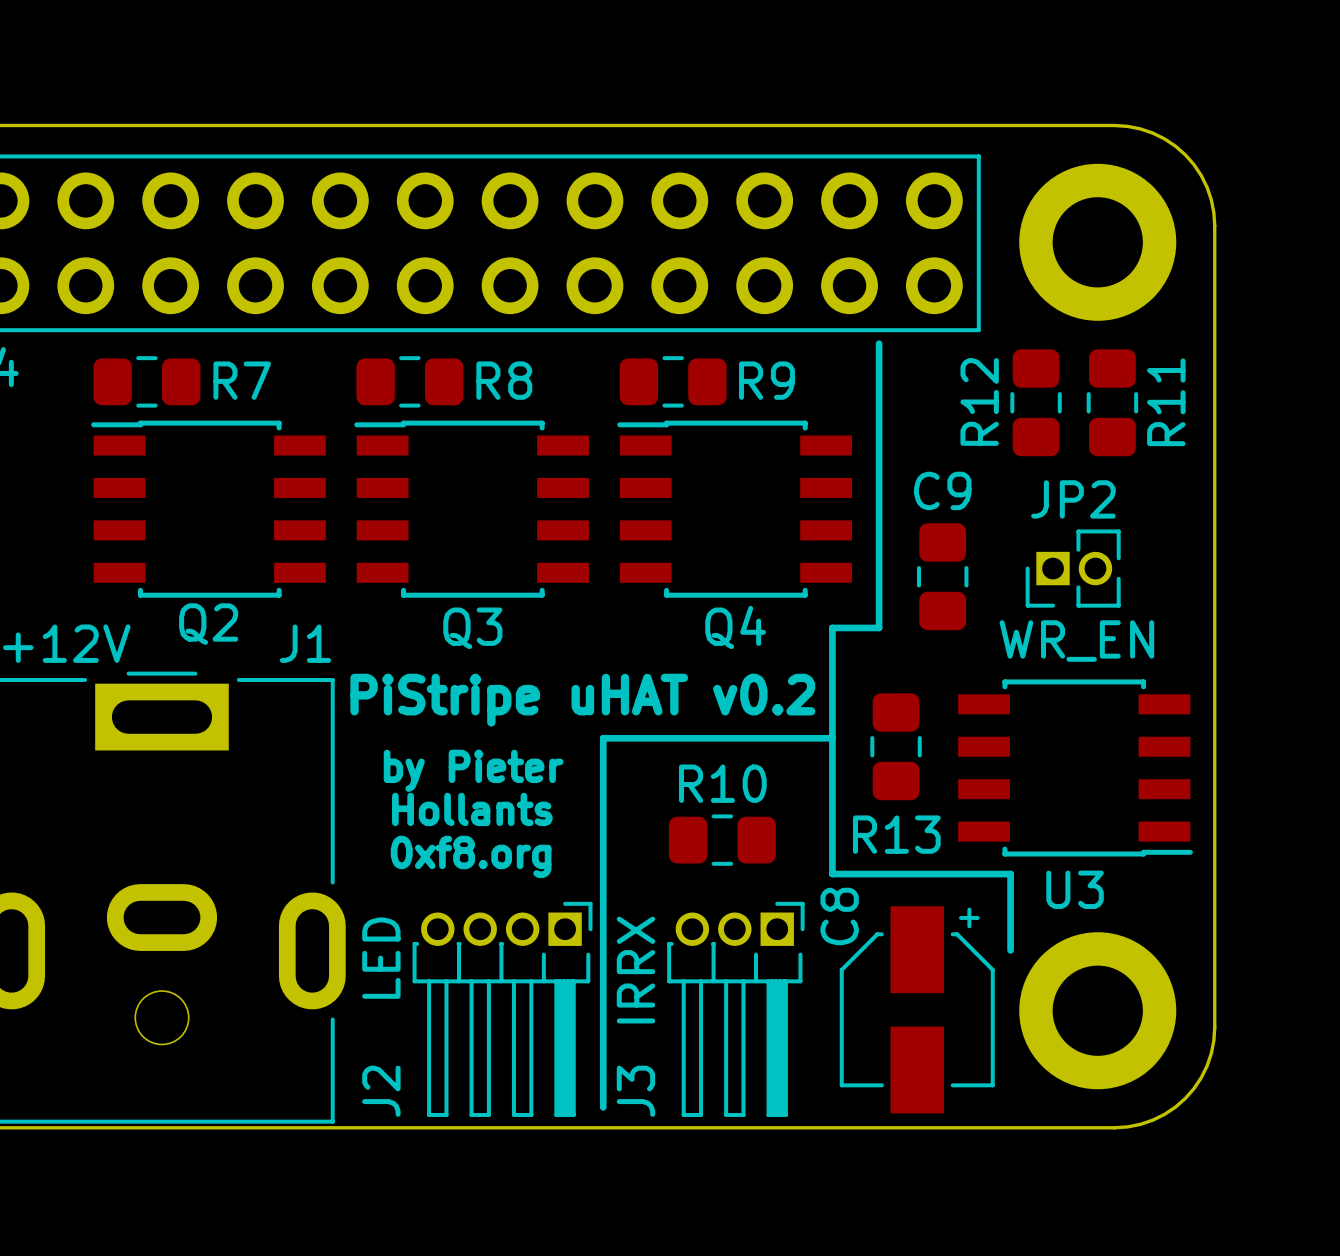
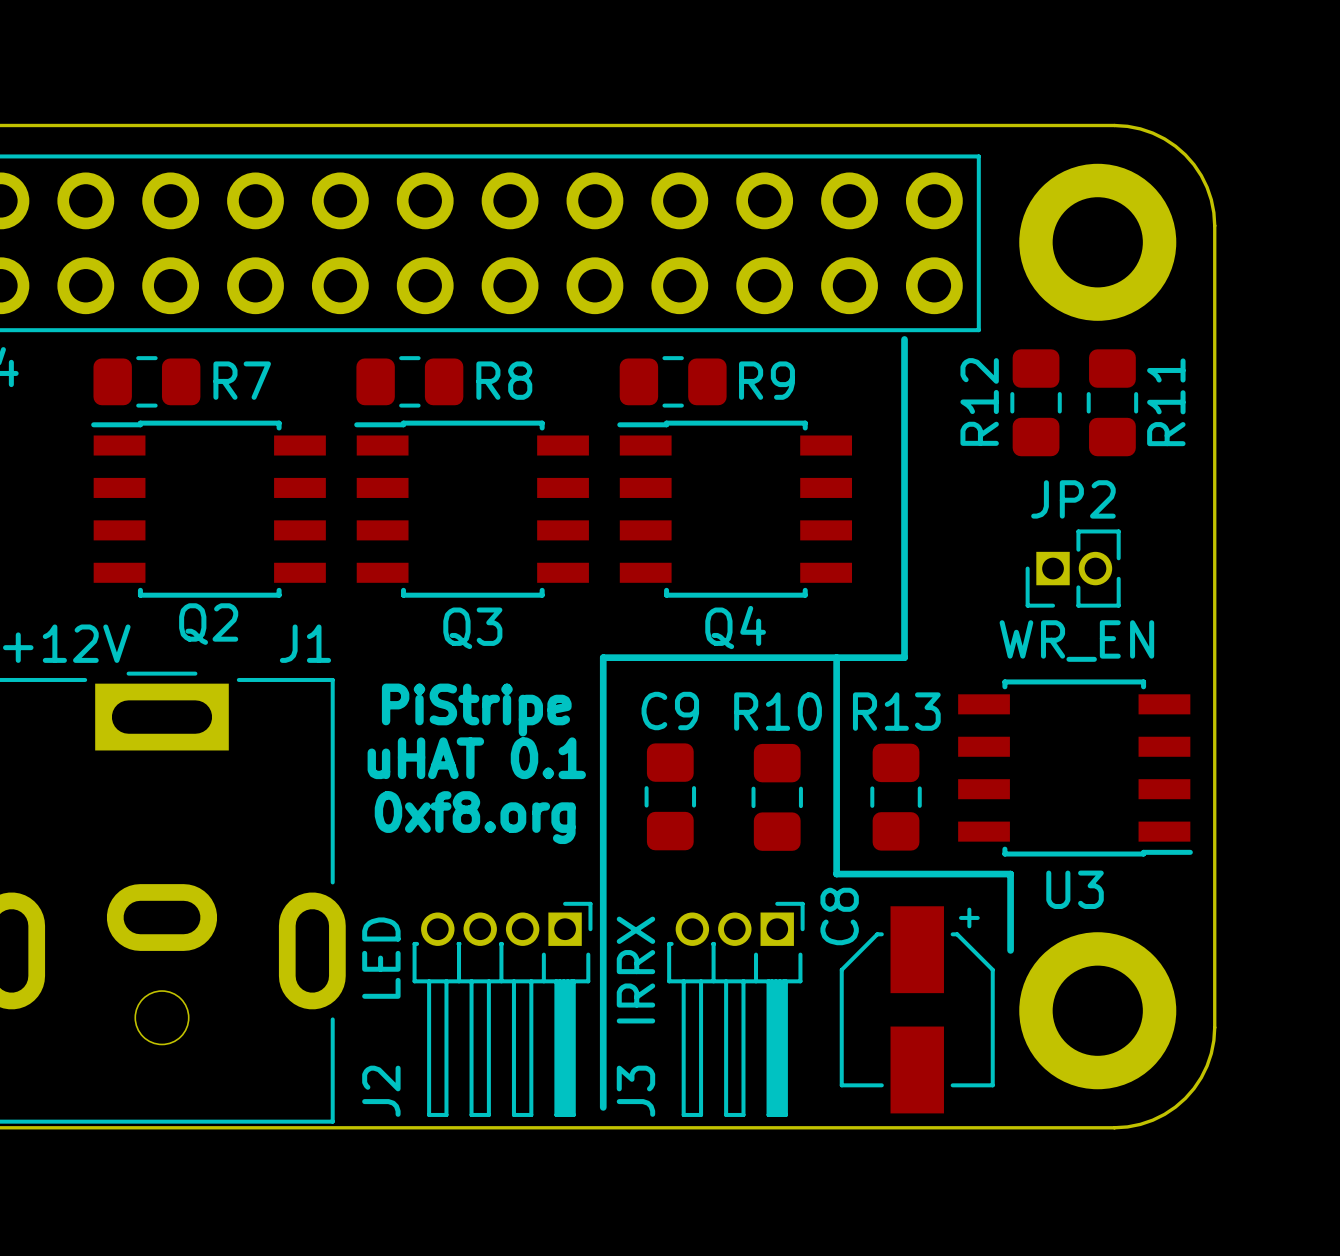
line: (879, 343) (879, 627) (832, 627) (832, 874) (836, 874) -> (836, 657) (836, 874)
C9 position: (942, 576) -> (670, 796)
text: PiStripe uHAT v0.2 (582, 700) -> PiStripe (476, 710)
line: (603, 738) (832, 738) -> (603, 738) (603, 657) (904, 657) (904, 339)
R13 position: (896, 746) -> (896, 797)
text: by Pieter (473, 770) -> uHAT 0.1 (476, 758)
text: Hollants (472, 809) -> 0xf8.org (475, 817)
R13 name position: R13 (896, 834) -> R13 (896, 711)
R10 rotation: 0° (722, 840) -> 90° clockwise (777, 797)
R10 position: (722, 840) -> (777, 797)
text: 0xf8.org (471, 856) -> none

